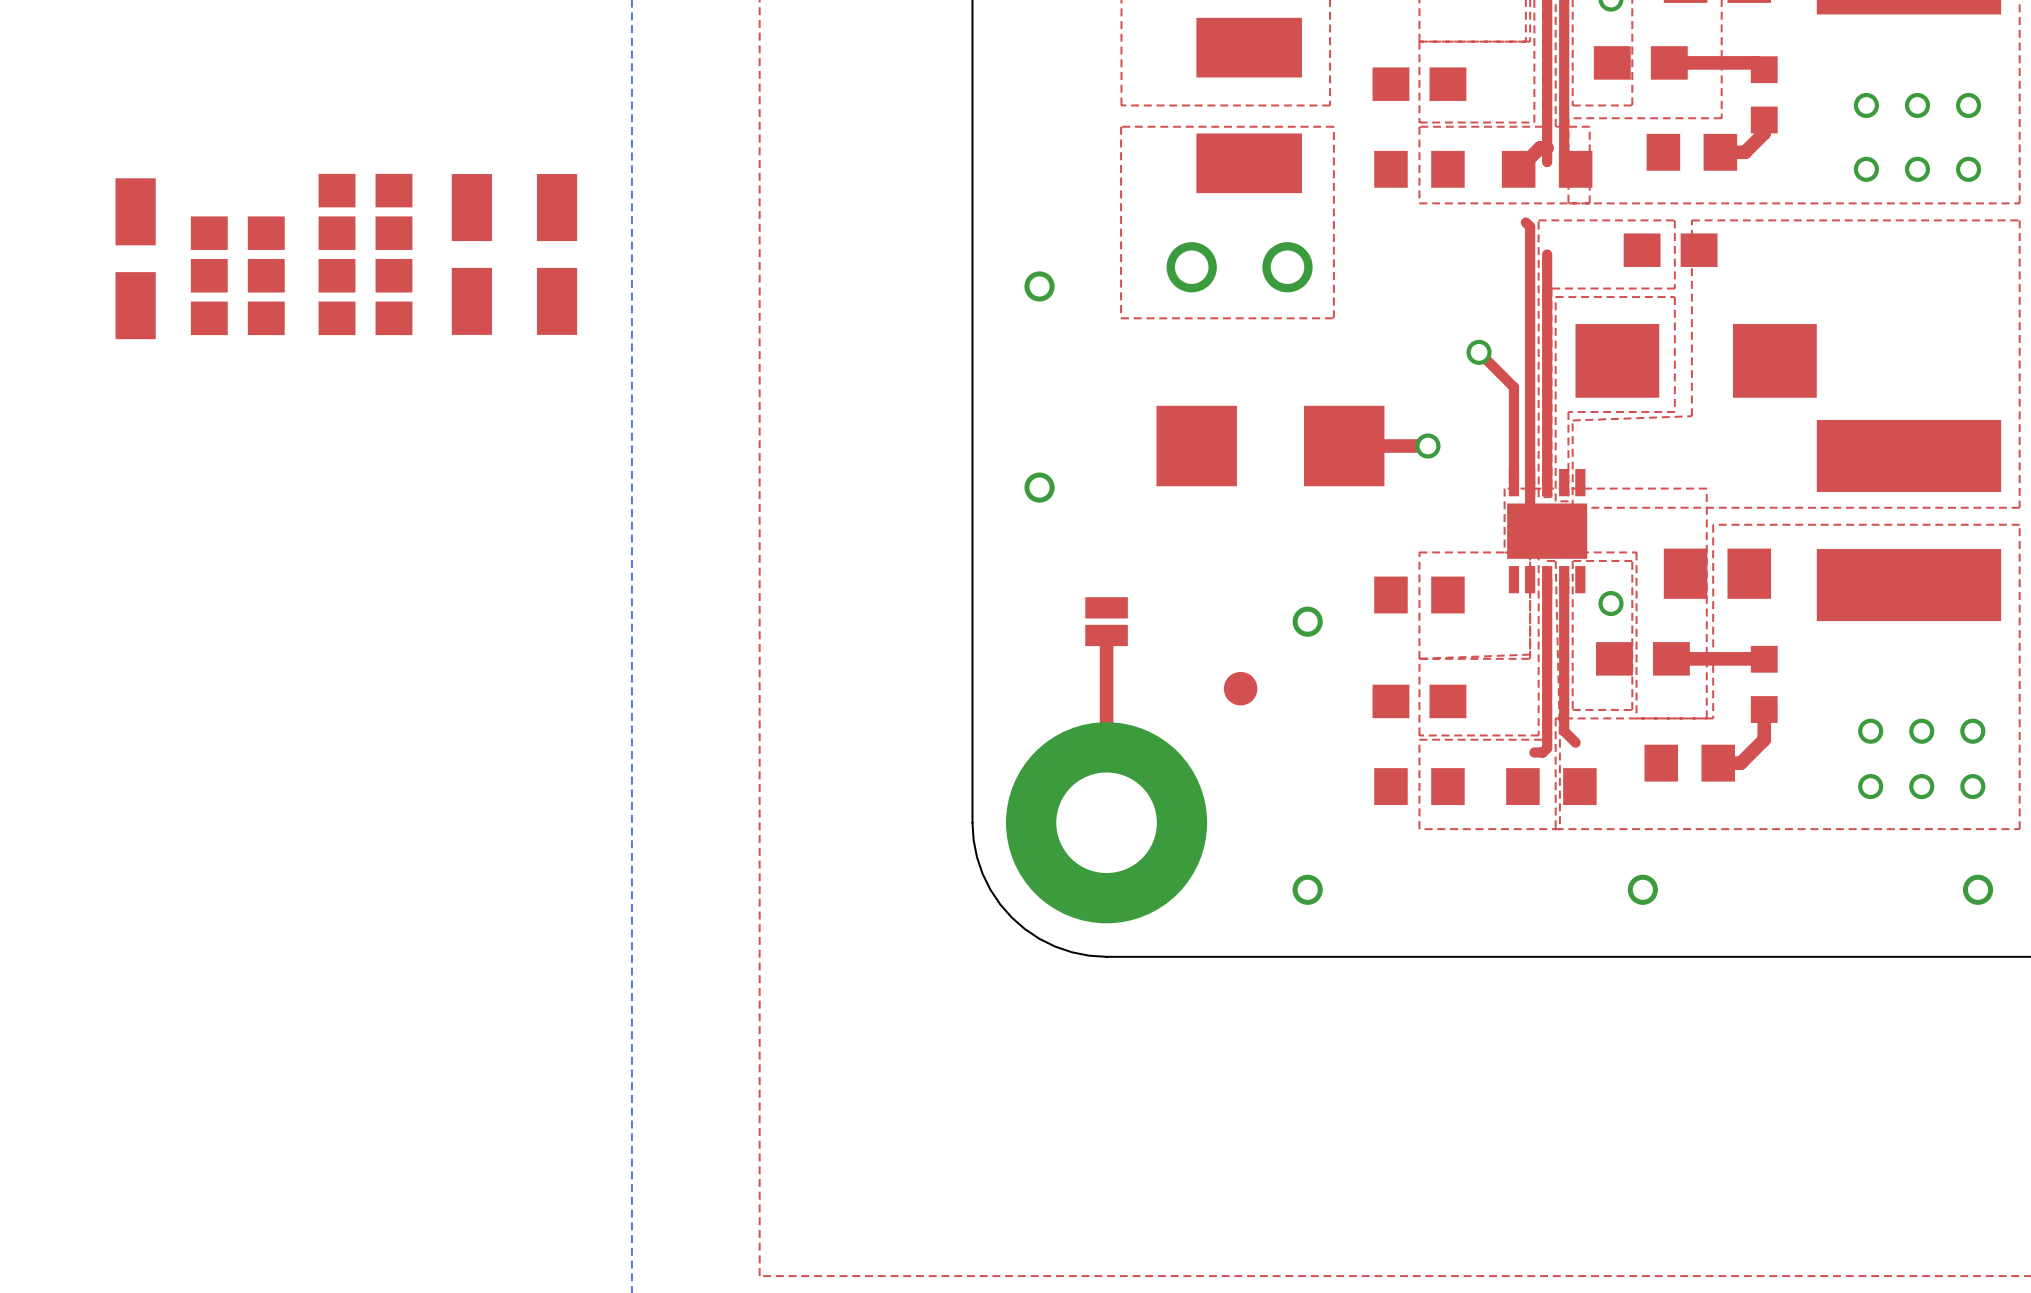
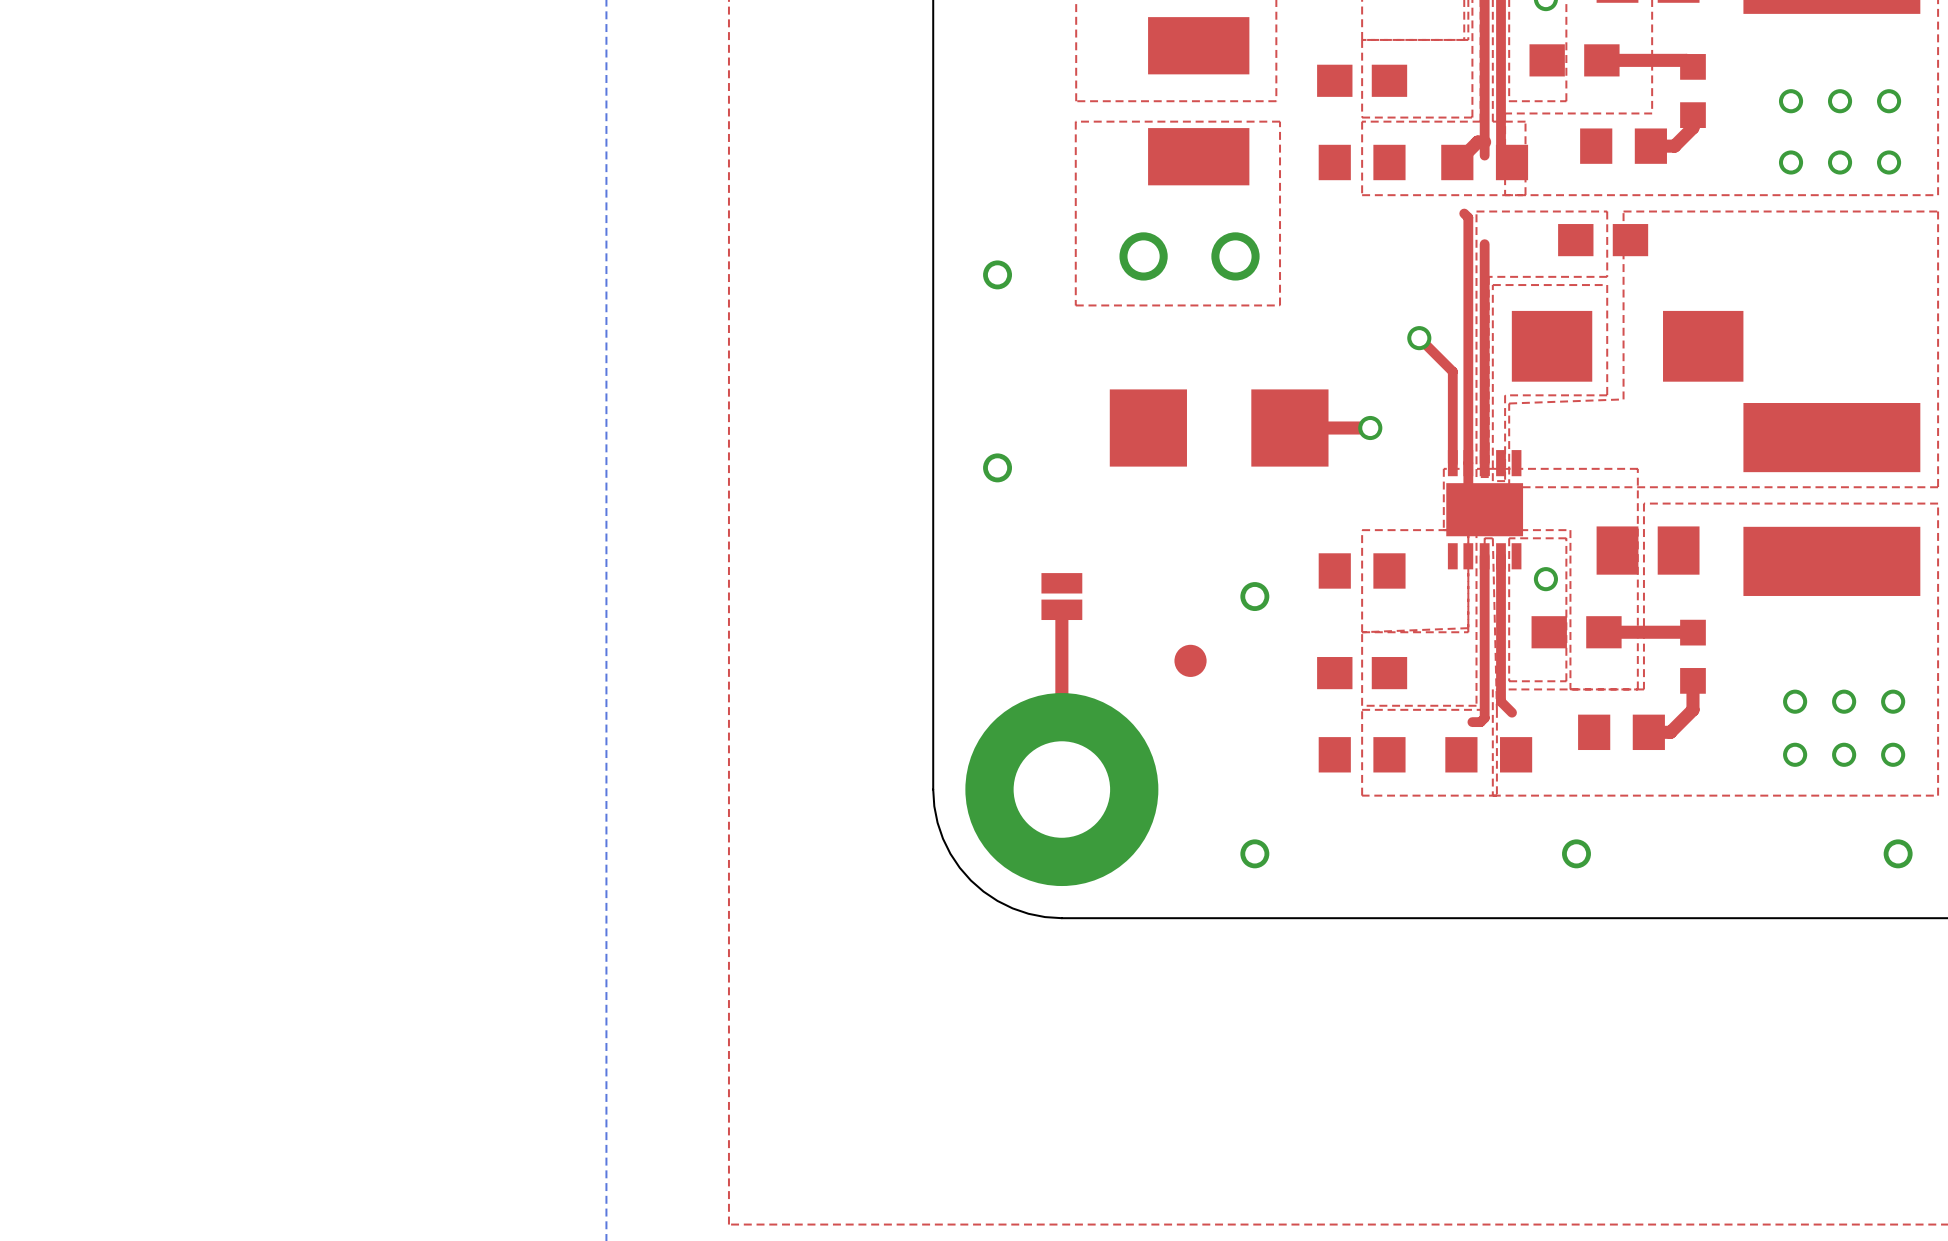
part: (365, 190) -> none
part: (237, 233) -> none
part: (365, 233) -> none
part: (471, 254) -> none
part: (557, 254) -> none
part: (135, 258) -> none
part: (237, 275) -> none
part: (365, 275) -> none
part: (237, 318) -> none
part: (365, 318) -> none

